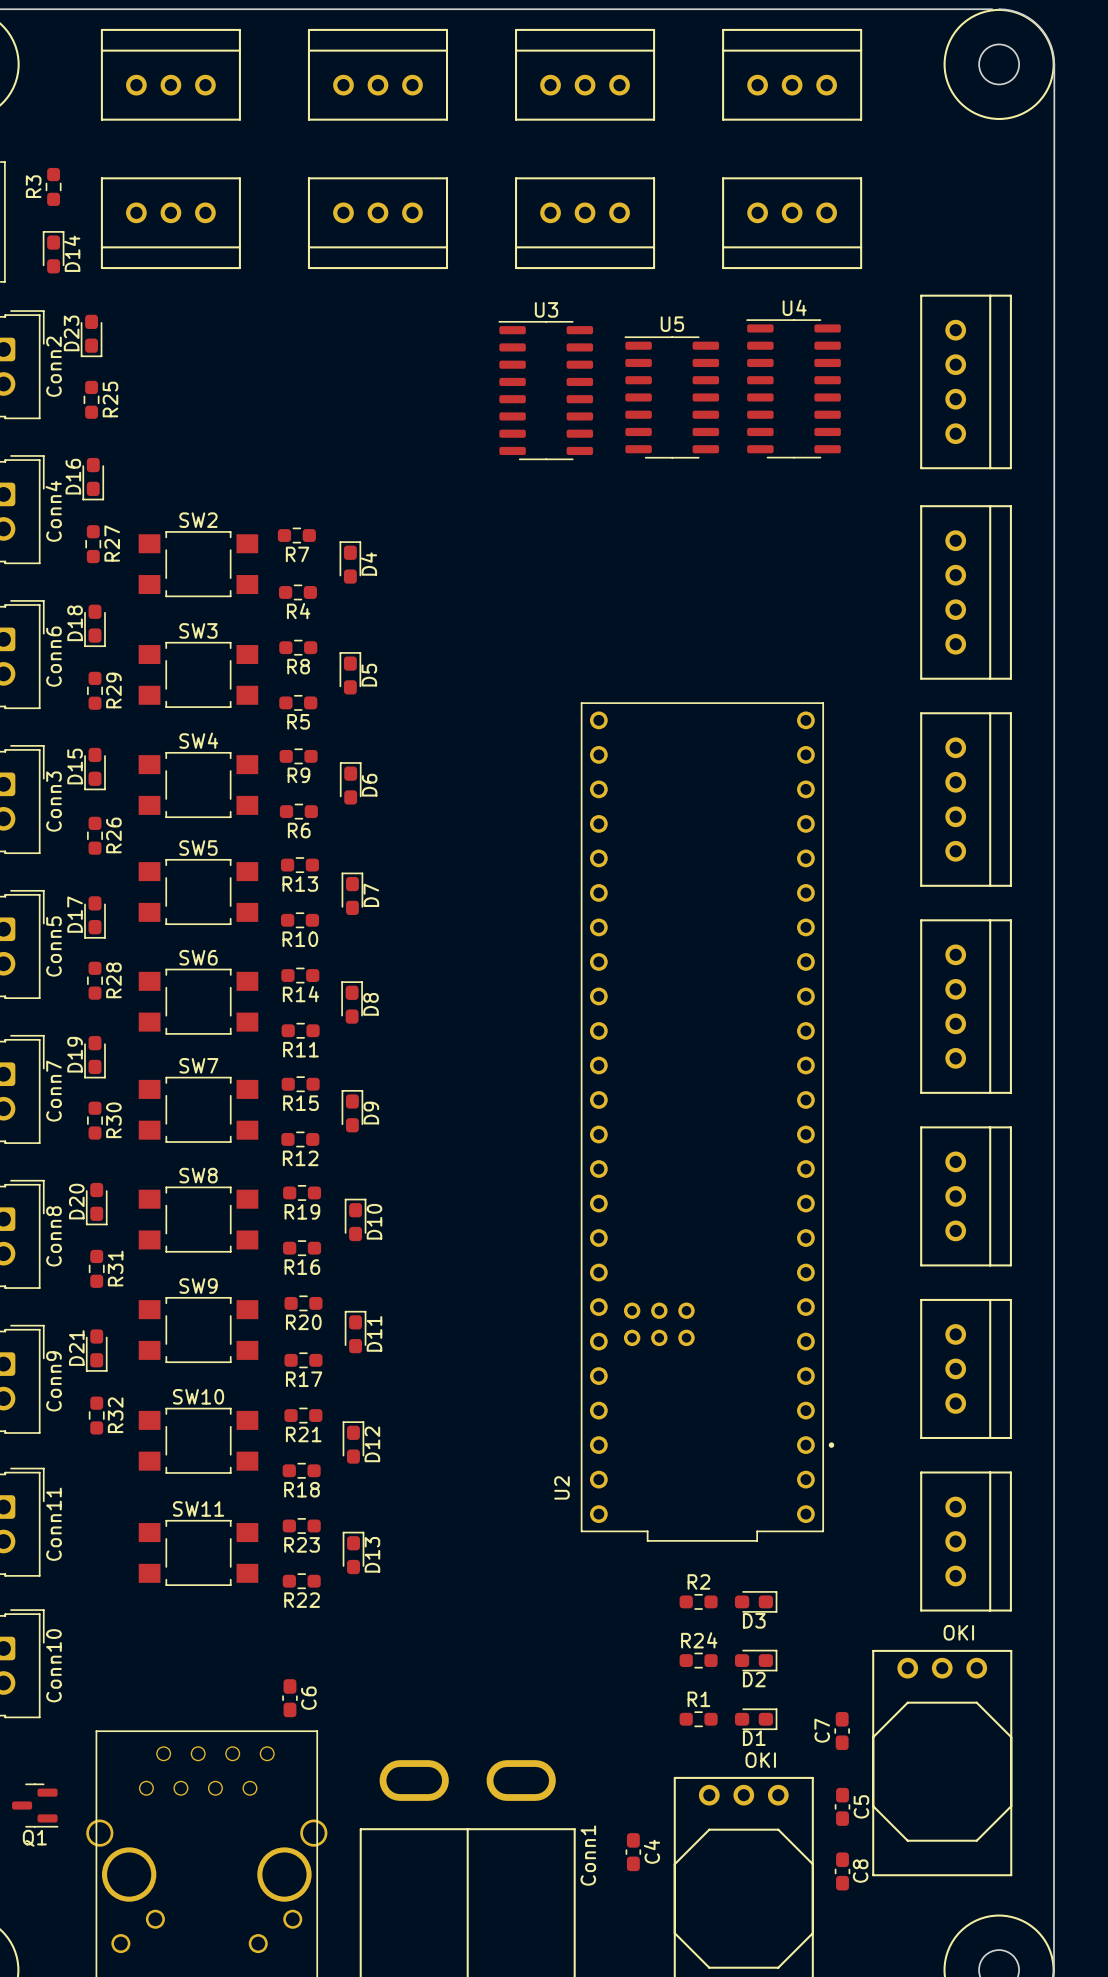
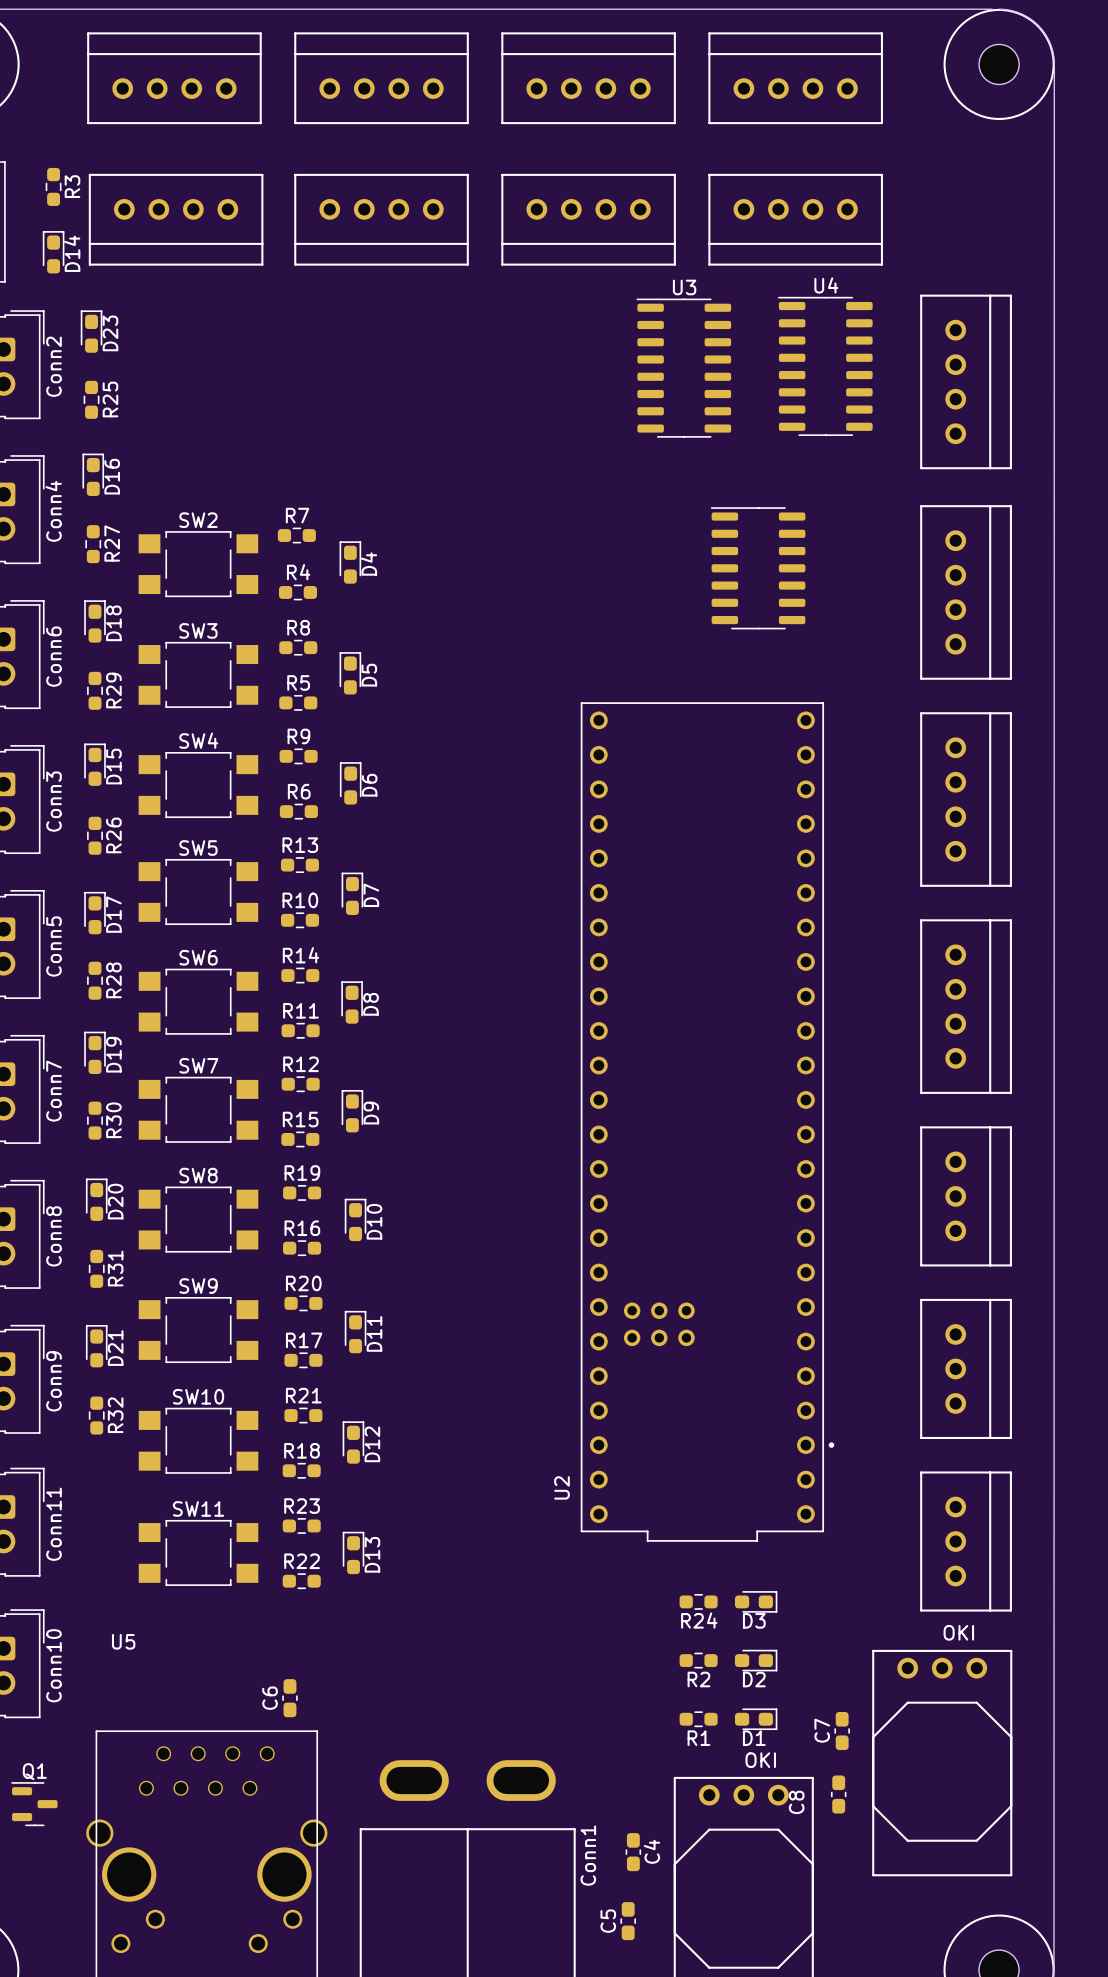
part footprint: [100, 28, 241, 121] -> [87, 32, 262, 125]
part footprint: [307, 28, 449, 121] -> [294, 32, 469, 125]
part footprint: [515, 28, 656, 121] -> [501, 32, 676, 125]
part footprint: [722, 28, 863, 121] -> [708, 32, 883, 125]
part footprint: [100, 177, 241, 270] -> [88, 173, 264, 266]
part footprint: [307, 177, 449, 270] -> [294, 173, 469, 266]
part footprint: [515, 177, 656, 270] -> [501, 173, 676, 266]
part footprint: [722, 177, 863, 270] -> [708, 173, 883, 266]
R3 name position: R3 (33, 186) -> R3 (72, 186)
U5 name position: U5 (672, 324) -> U5 (123, 1641)
D23 rotation: 0° (91, 335) -> 180° (91, 331)
U4 position: (793, 388) -> (825, 366)
U3 position: (545, 390) -> (683, 368)
U5 position: (671, 397) -> (758, 568)
D16 rotation: 0° (93, 479) -> 180° (93, 474)
R7 name position: R7 (297, 554) -> R7 (297, 515)
R4 name position: R4 (298, 611) -> R4 (298, 572)
D18 rotation: 0° (94, 625) -> 180° (94, 621)
R8 name position: R8 (298, 666) -> R8 (298, 627)
R5 name position: R5 (298, 721) -> R5 (298, 682)
D15 rotation: 0° (94, 769) -> 180° (94, 764)
R9 name position: R9 (298, 775) -> R9 (298, 736)
R6 name position: R6 (299, 830) -> R6 (299, 791)
R13 name position: R13 (300, 884) -> R13 (300, 845)
D17 rotation: 0° (94, 917) -> 180° (94, 913)
R10 name position: R10 (300, 939) -> R10 (300, 900)
R14 name position: R14 (300, 994) -> R14 (300, 955)
R11 name position: R11 (300, 1049) -> R11 (300, 1010)
D19 rotation: 0° (94, 1057) -> 180° (94, 1052)
R15 name: R15 (300, 1103) -> R12 (300, 1064)
R12 name: R12 (300, 1158) -> R15 (300, 1119)
D20 rotation: 0° (96, 1204) -> 180° (96, 1199)
R19 name position: R19 (302, 1211) -> R19 (302, 1173)
R16 name position: R16 (302, 1267) -> R16 (302, 1228)
R20 name position: R20 (303, 1322) -> R20 (303, 1283)
D21 rotation: 0° (96, 1350) -> 180° (96, 1346)
R17 name position: R17 (304, 1379) -> R17 (304, 1340)
R21 name position: R21 (303, 1434) -> R21 (303, 1395)
R18 name position: R18 (302, 1489) -> R18 (302, 1450)
R23 name position: R23 (302, 1544) -> R23 (302, 1506)
R2 name: R2 (698, 1581) -> R24 (699, 1620)
R22 name position: R22 (302, 1600) -> R22 (302, 1561)
R24 name: R24 (699, 1640) -> R2 (698, 1679)
C6 name position: C6 (308, 1698) -> C6 (270, 1698)
R1 name position: R1 (698, 1699) -> R1 (698, 1738)
Q1 rotation: 0° (35, 1805) -> 180° (34, 1804)
C5 position: (842, 1806) -> (628, 1921)
C5 name position: C5 (861, 1806) -> C5 (608, 1921)
C8 position: (842, 1871) -> (838, 1794)
C8 name position: C8 (860, 1871) -> C8 (796, 1802)

